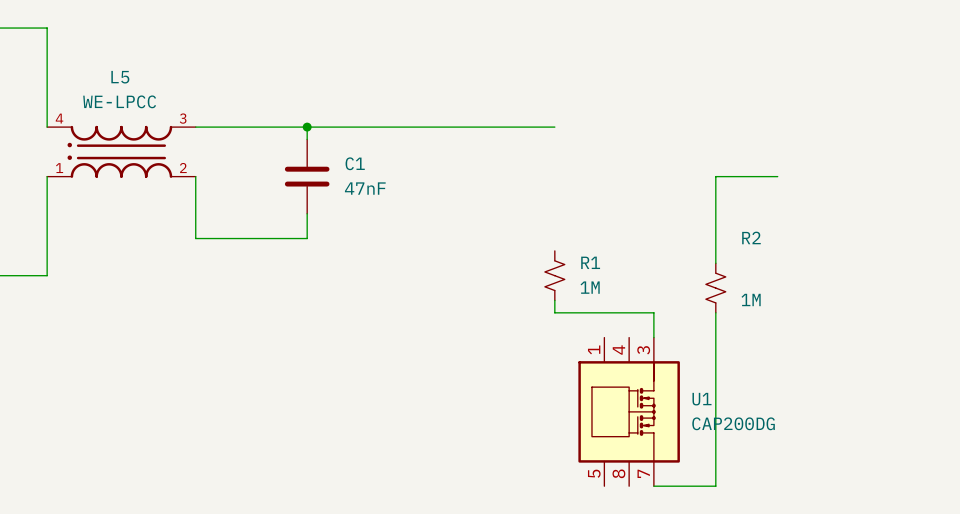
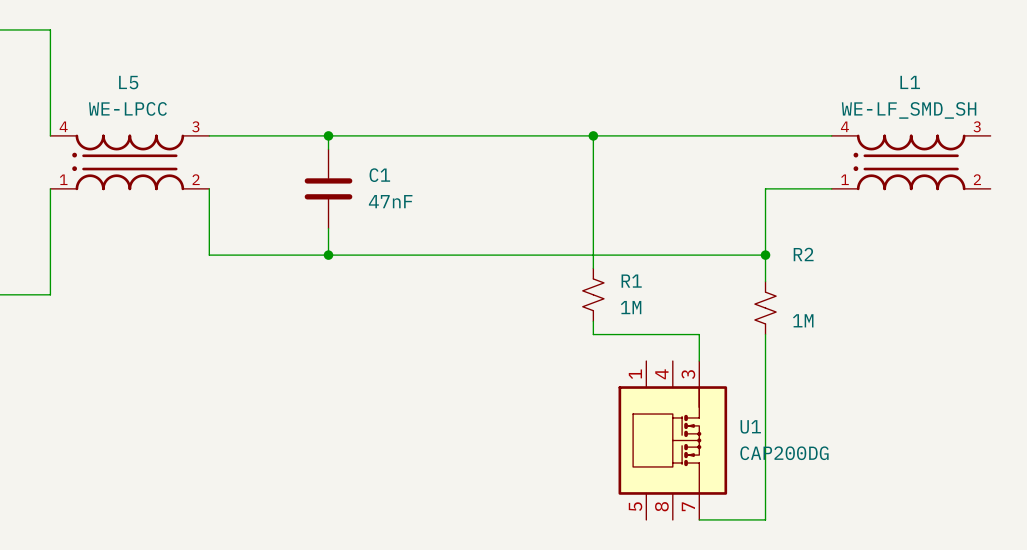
junction: none -> (593, 135)
wire: none -> (831, 135) (593, 135) (593, 268)
L1: none -> WE-LF_SMD_SH (911, 162)
wire: none -> (328, 255) (765, 255)
junction: none -> (328, 255)
junction: none -> (765, 255)

